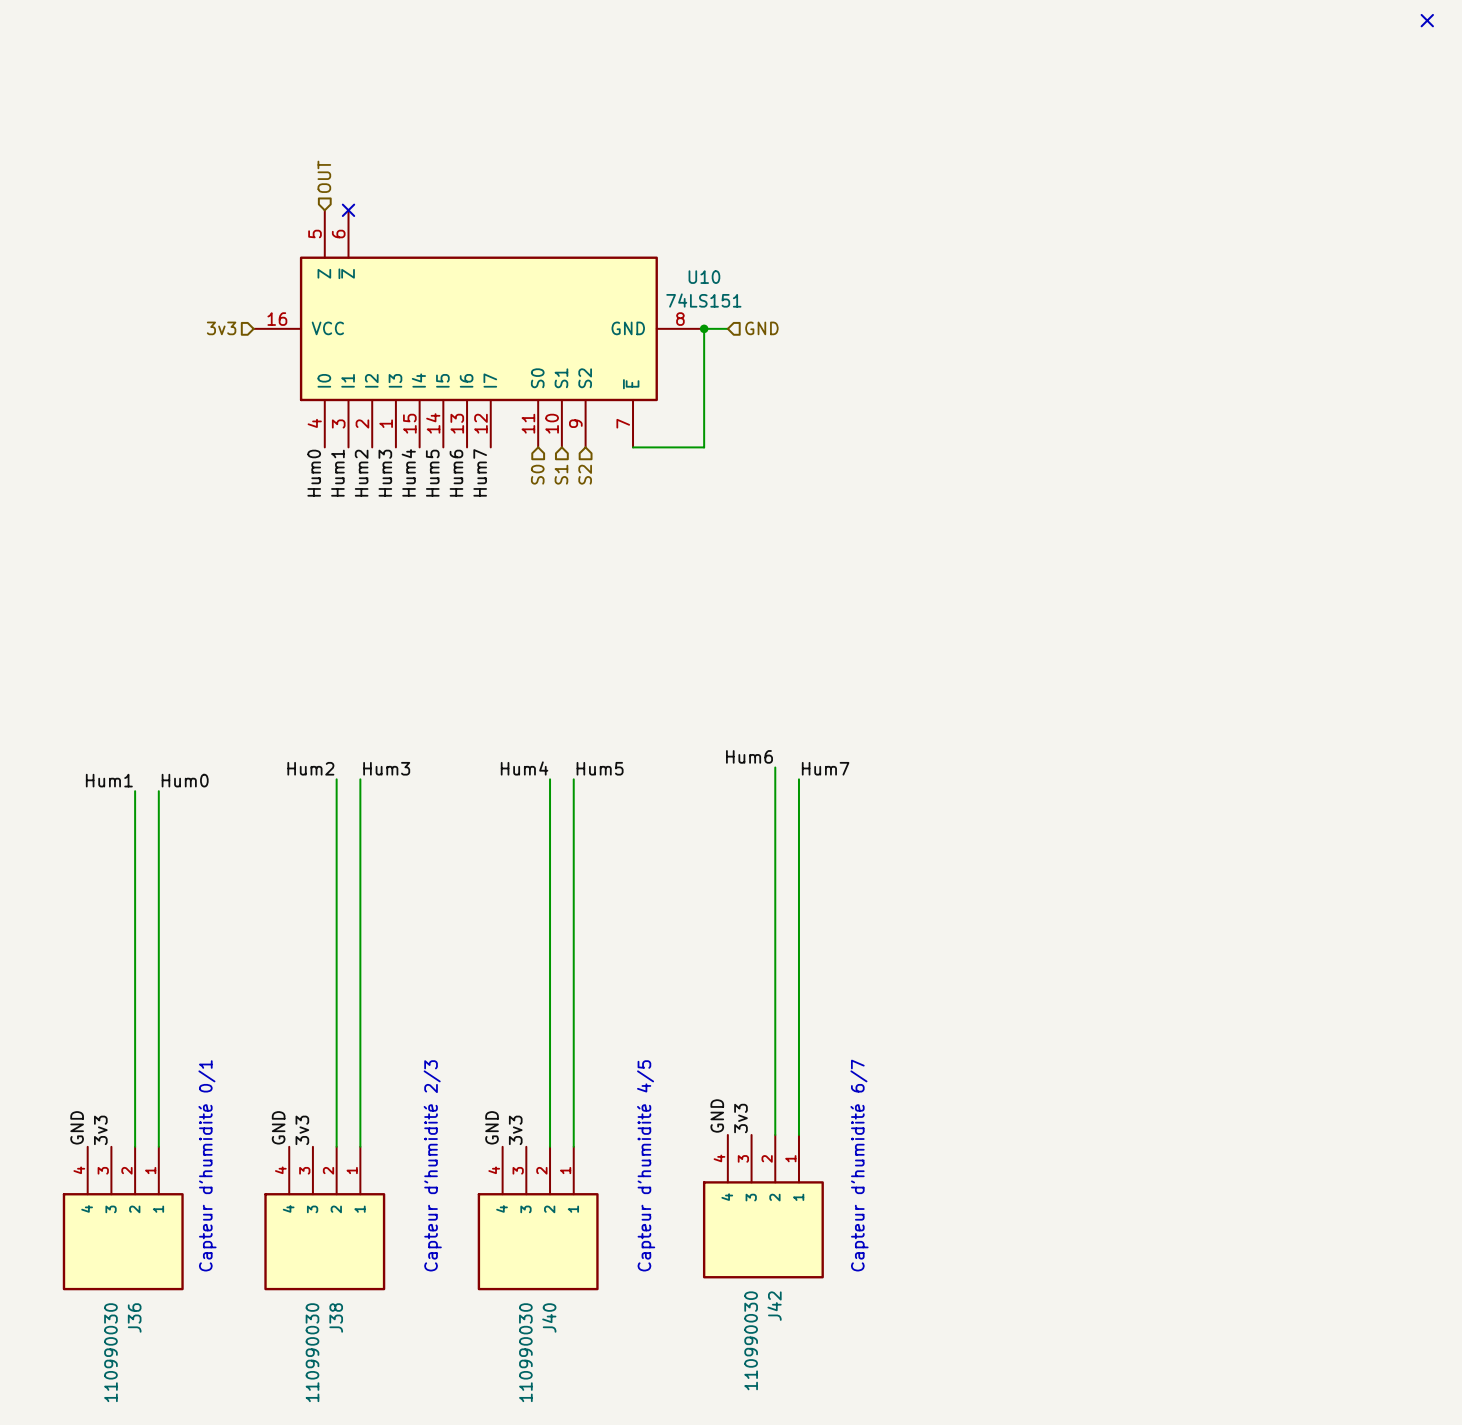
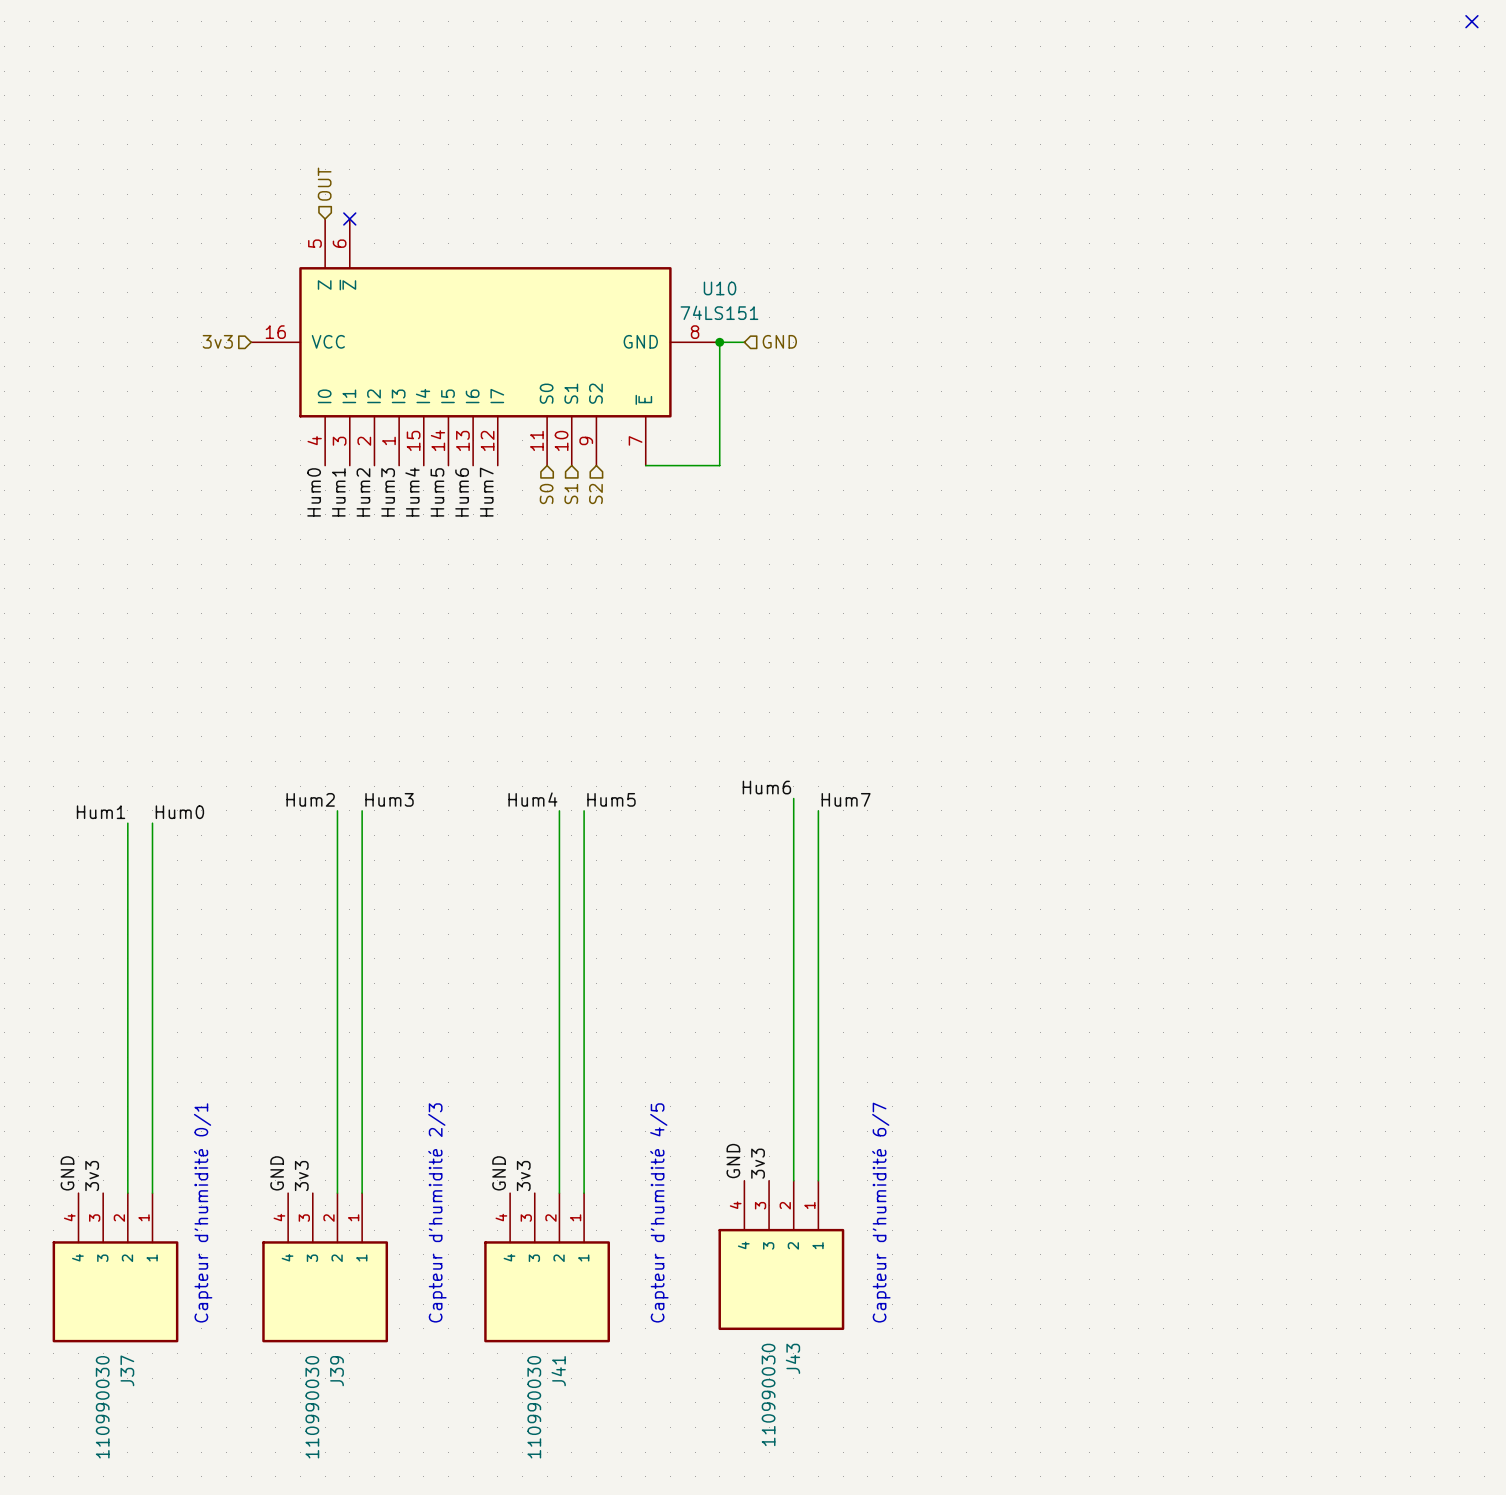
J42 name: J42 (774, 1306) -> J43 (792, 1358)
J36 name: J36 (134, 1317) -> J37 (127, 1370)
J38 name: J38 (336, 1317) -> J39 (337, 1371)
J40 name: J40 (549, 1317) -> J41 (558, 1371)

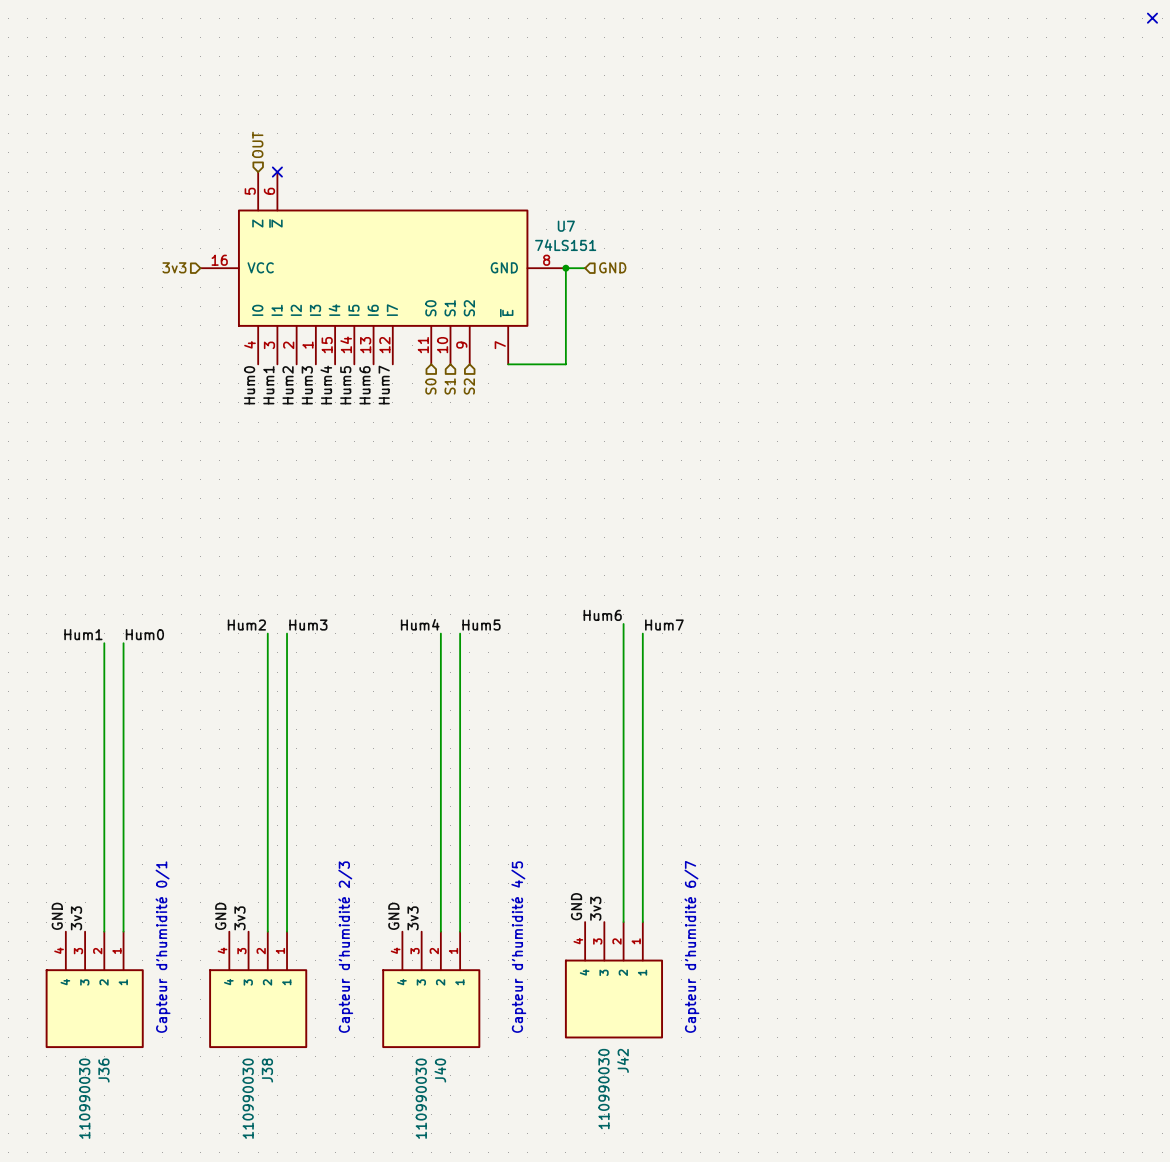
U10 name: U10 (720, 288) -> U7 (566, 226)
J43 name: J43 (792, 1358) -> J42 (622, 1060)
J37 name: J37 (127, 1370) -> J36 (103, 1070)
J39 name: J39 (337, 1371) -> J38 (267, 1070)
J41 name: J41 (558, 1371) -> J40 (440, 1070)

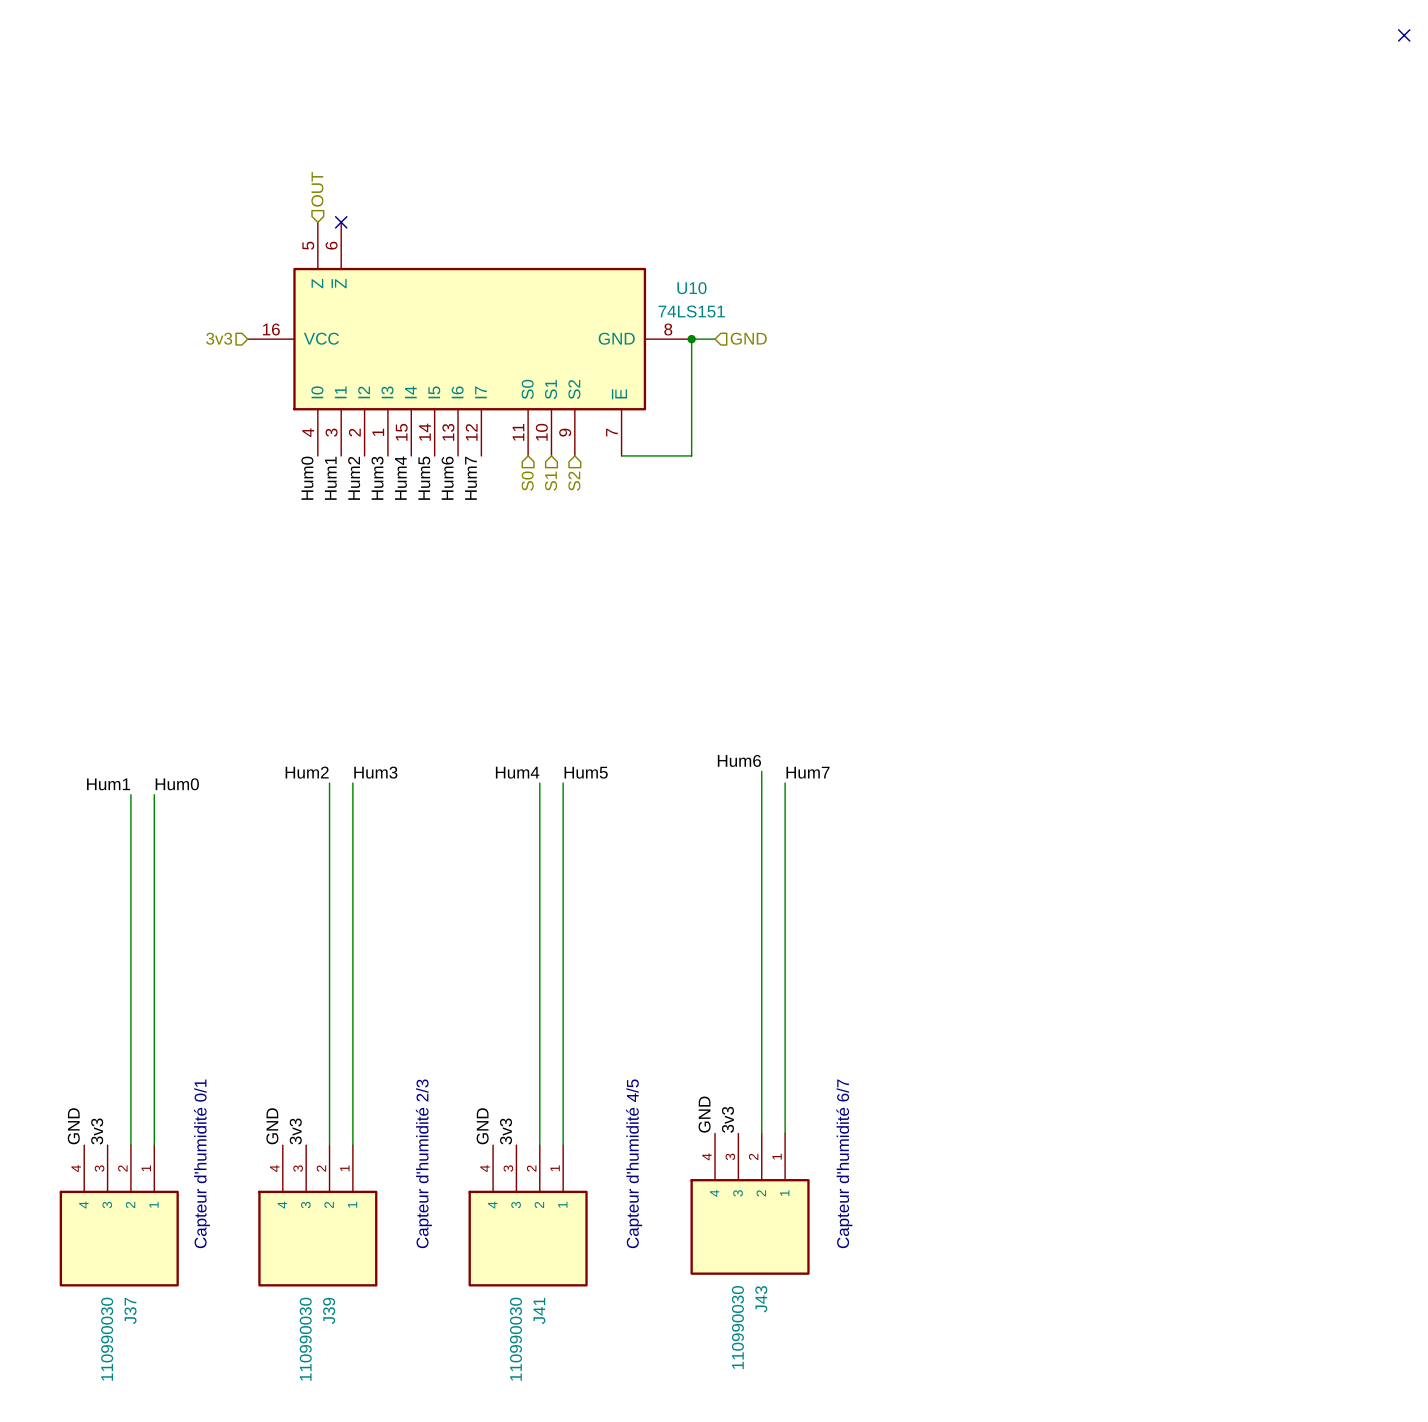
U7 name: U7 (566, 226) -> U10 (691, 288)
J42 name: J42 (622, 1060) -> J43 (761, 1299)
J36 name: J36 (103, 1070) -> J37 (130, 1310)
J38 name: J38 (267, 1070) -> J39 (329, 1310)
J40 name: J40 (440, 1070) -> J41 (539, 1310)

